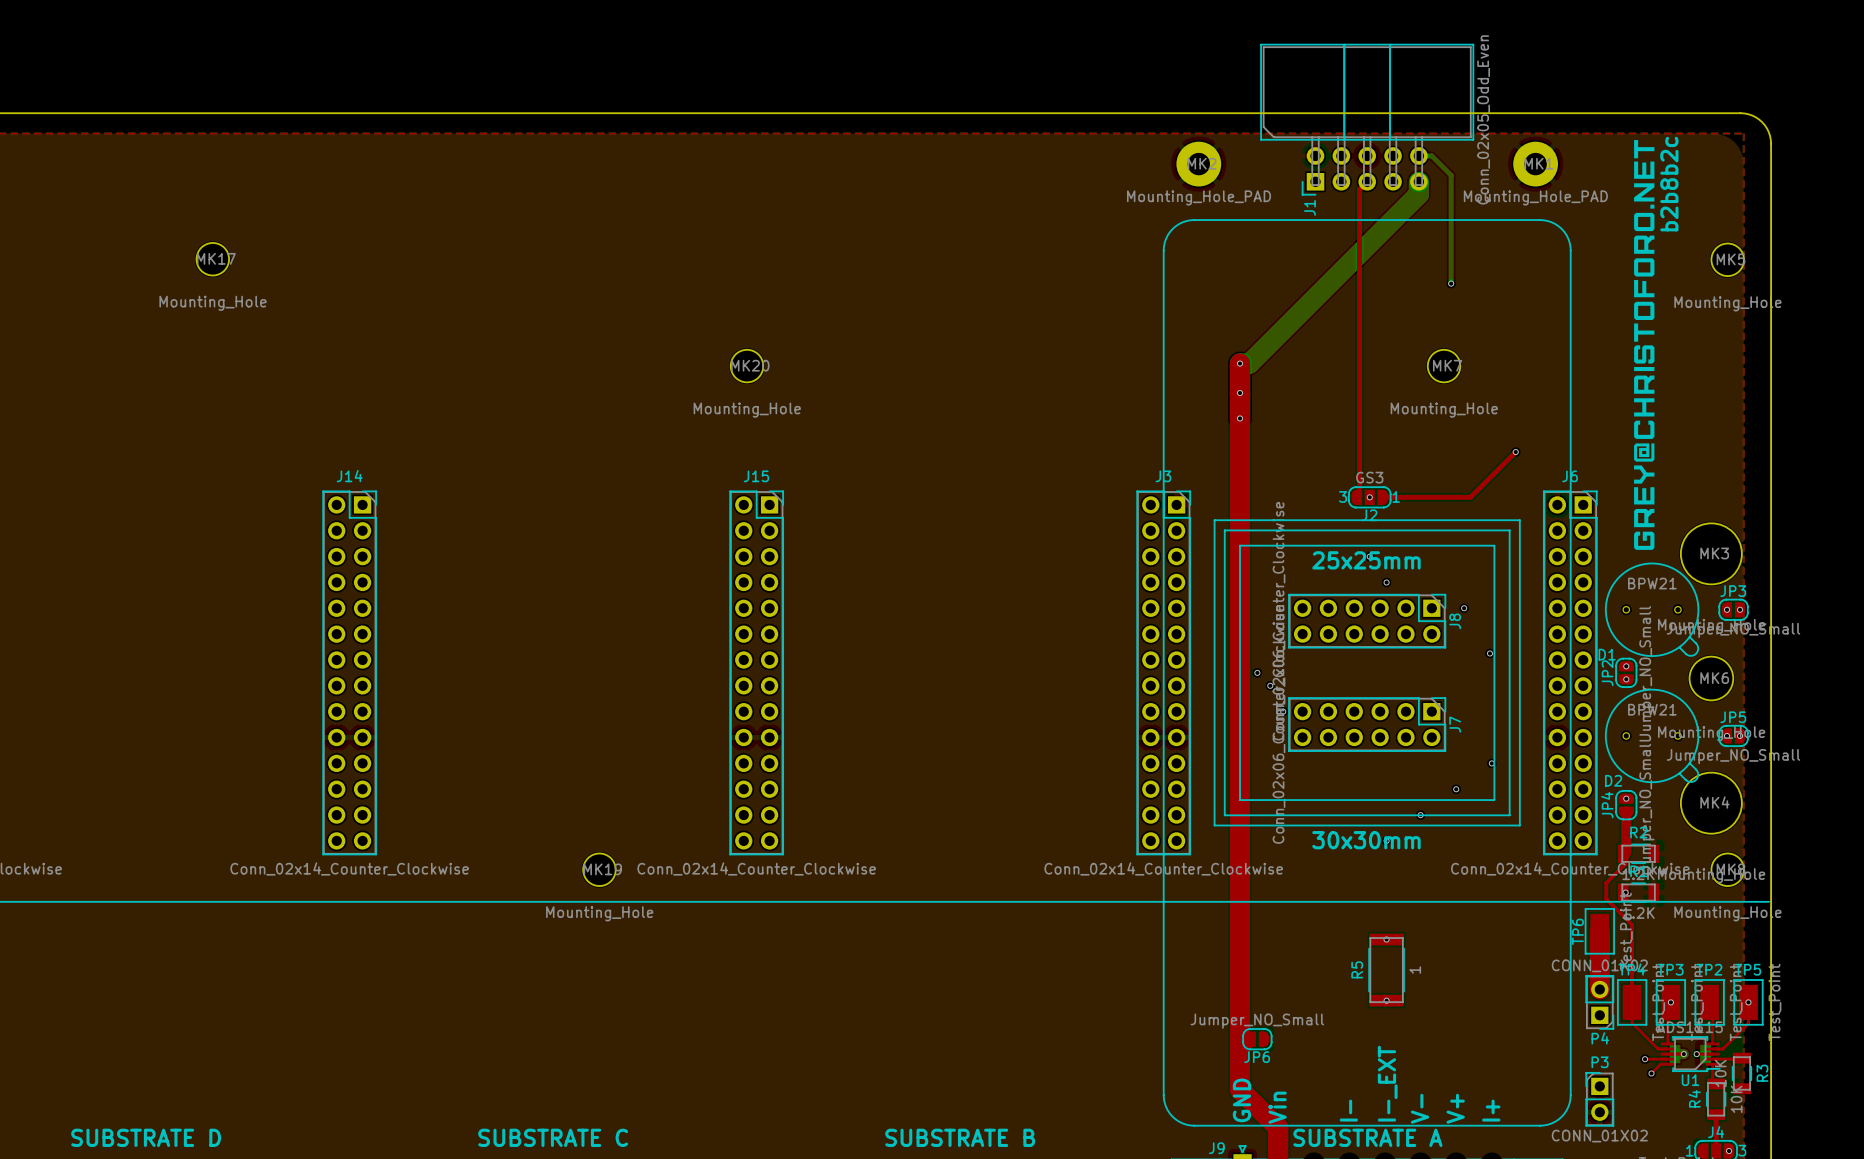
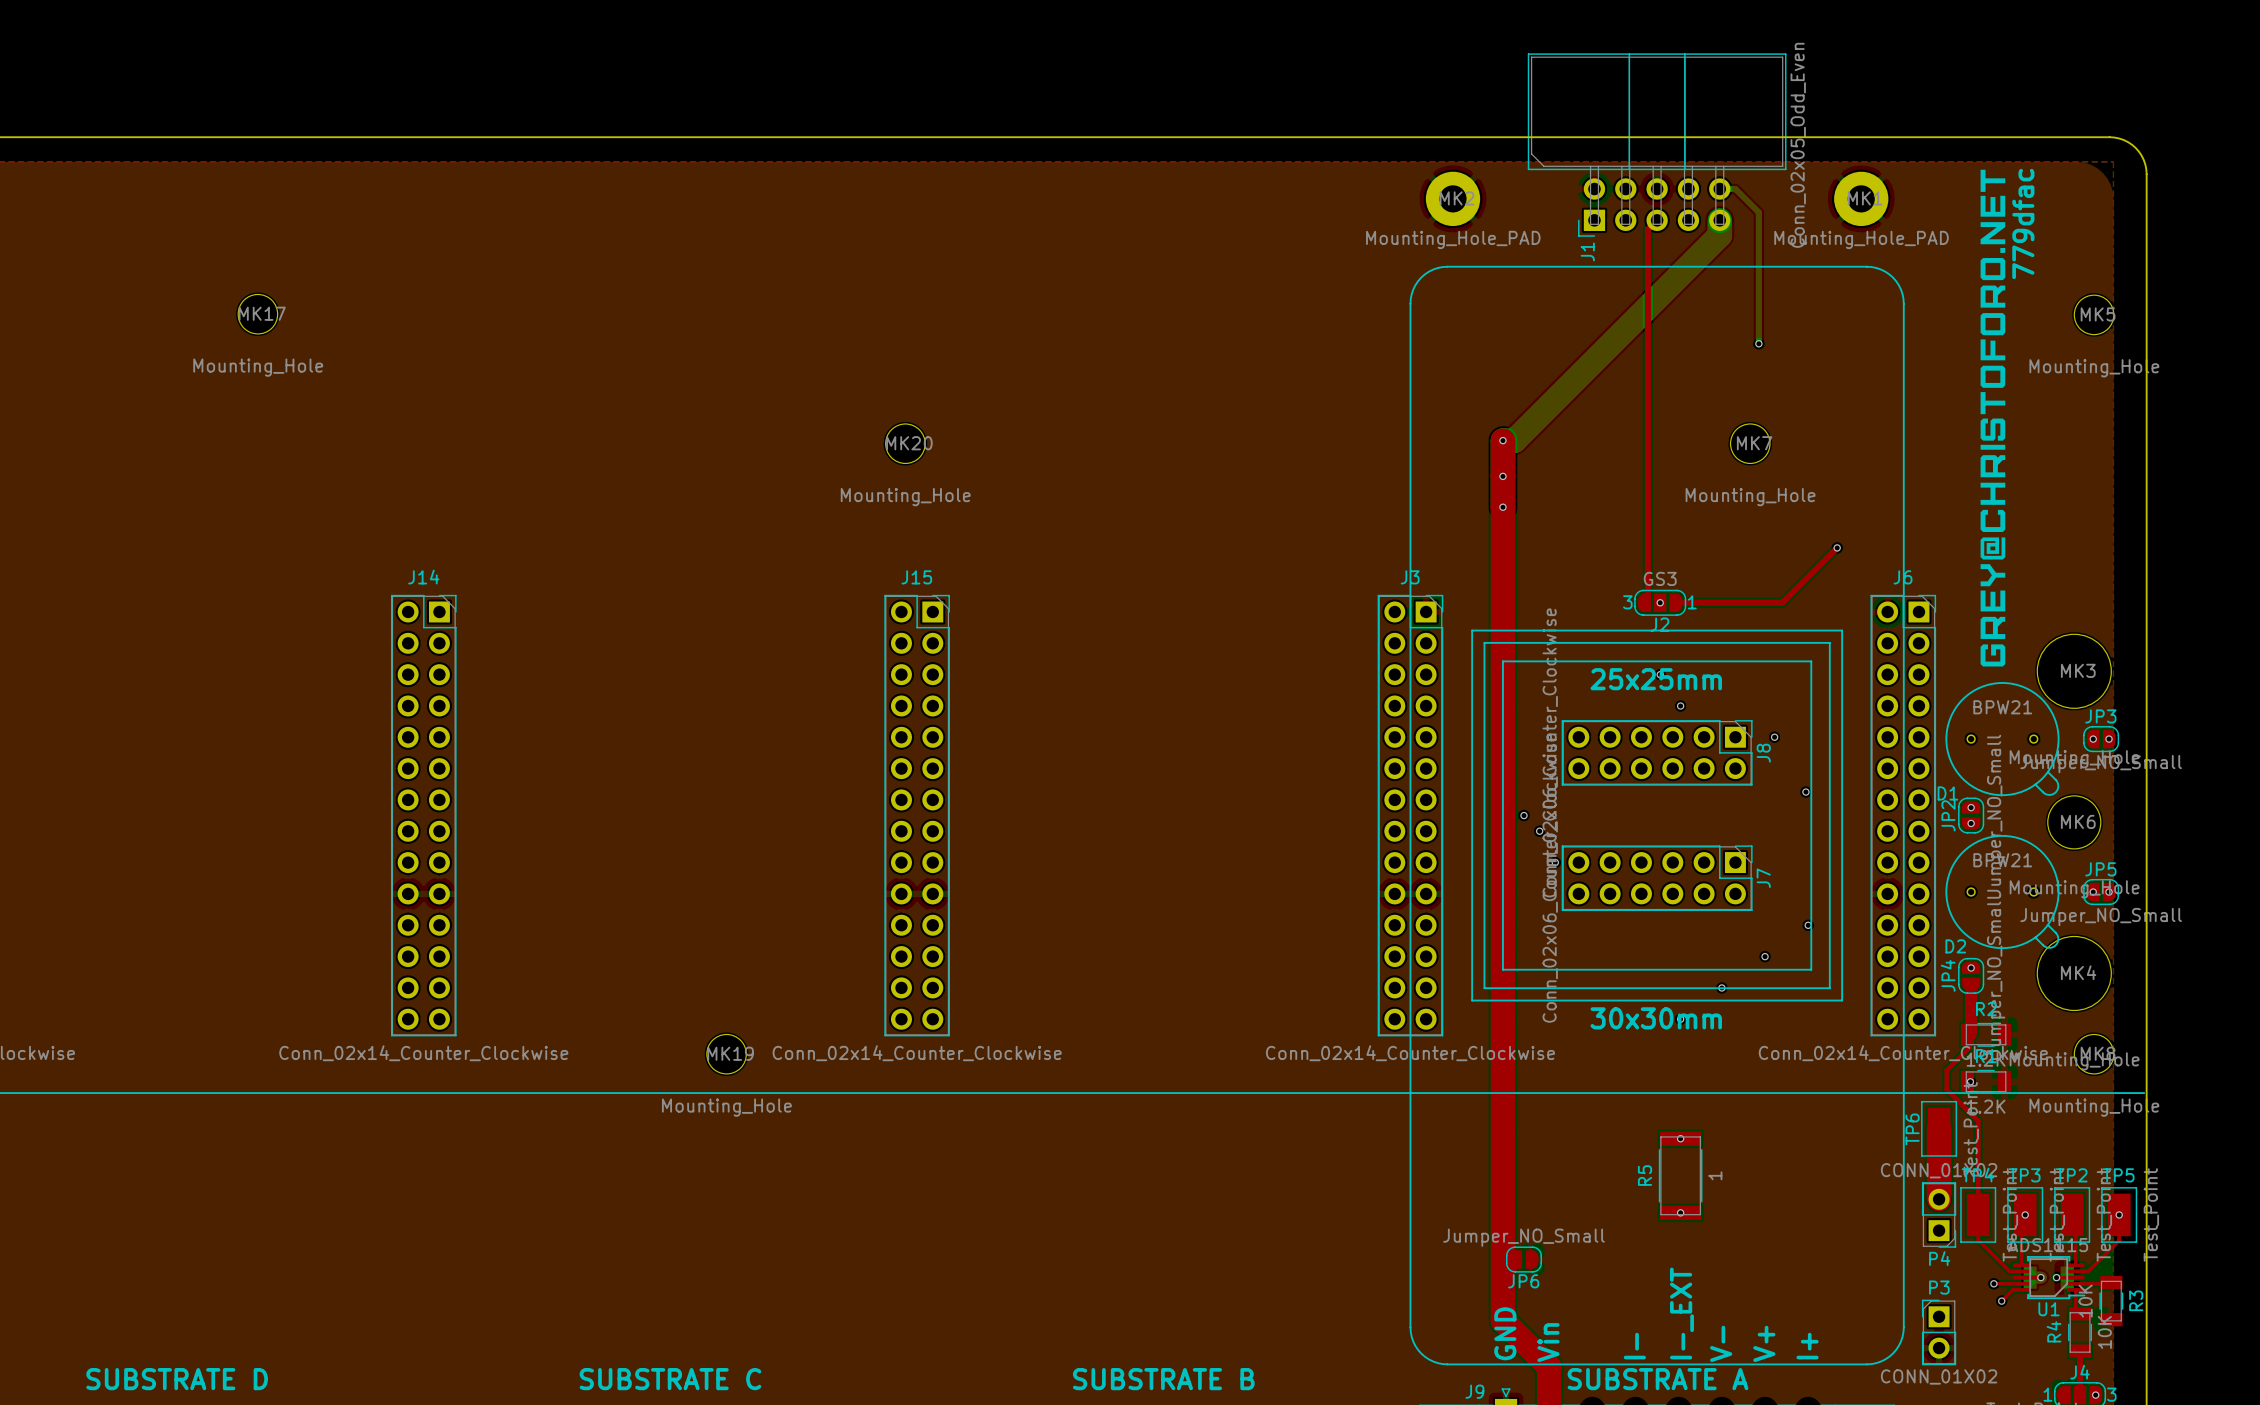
text: b2b8b2c (1669, 184) -> 779dfac (2023, 223)

